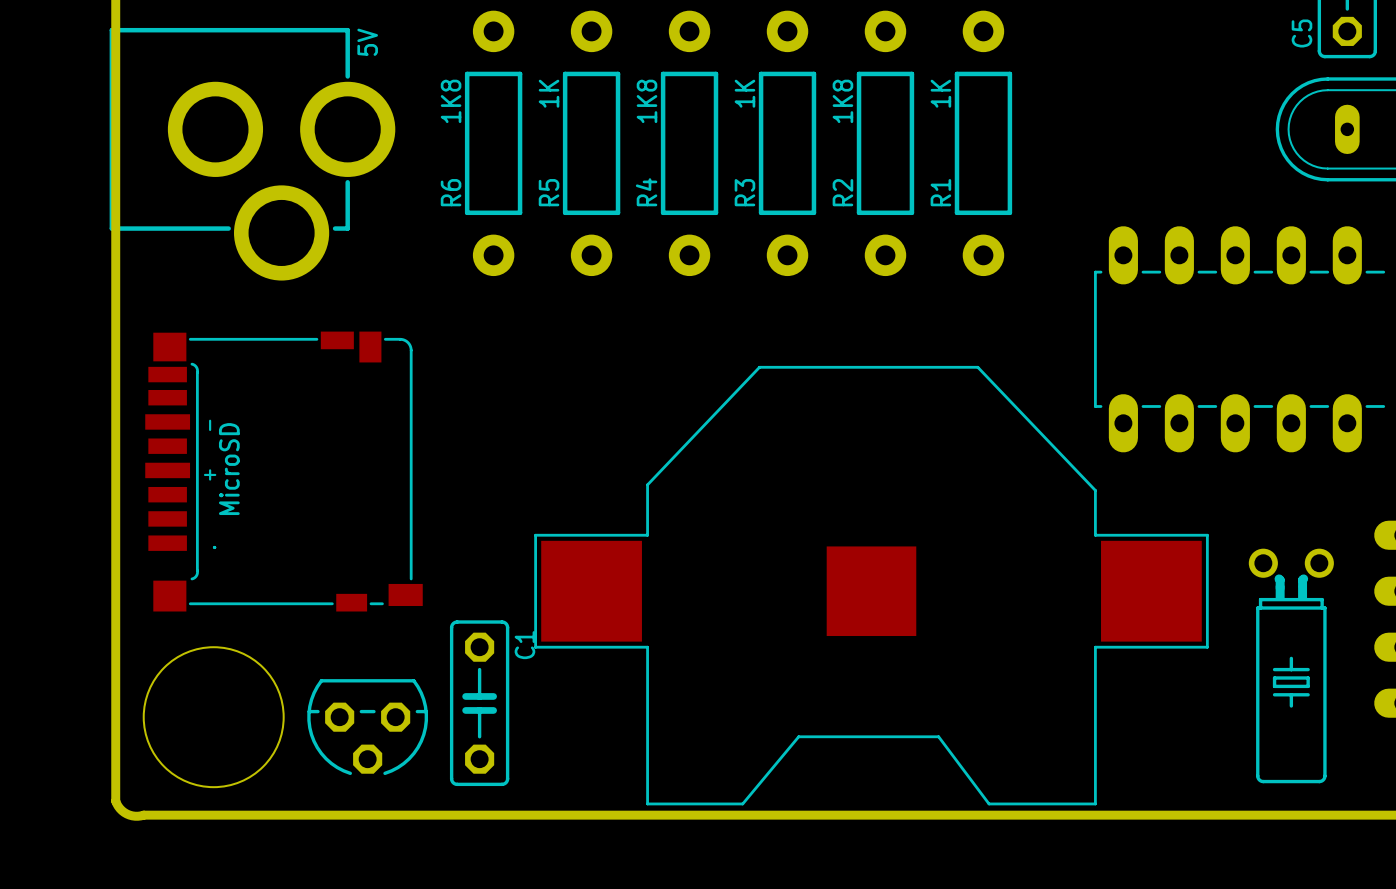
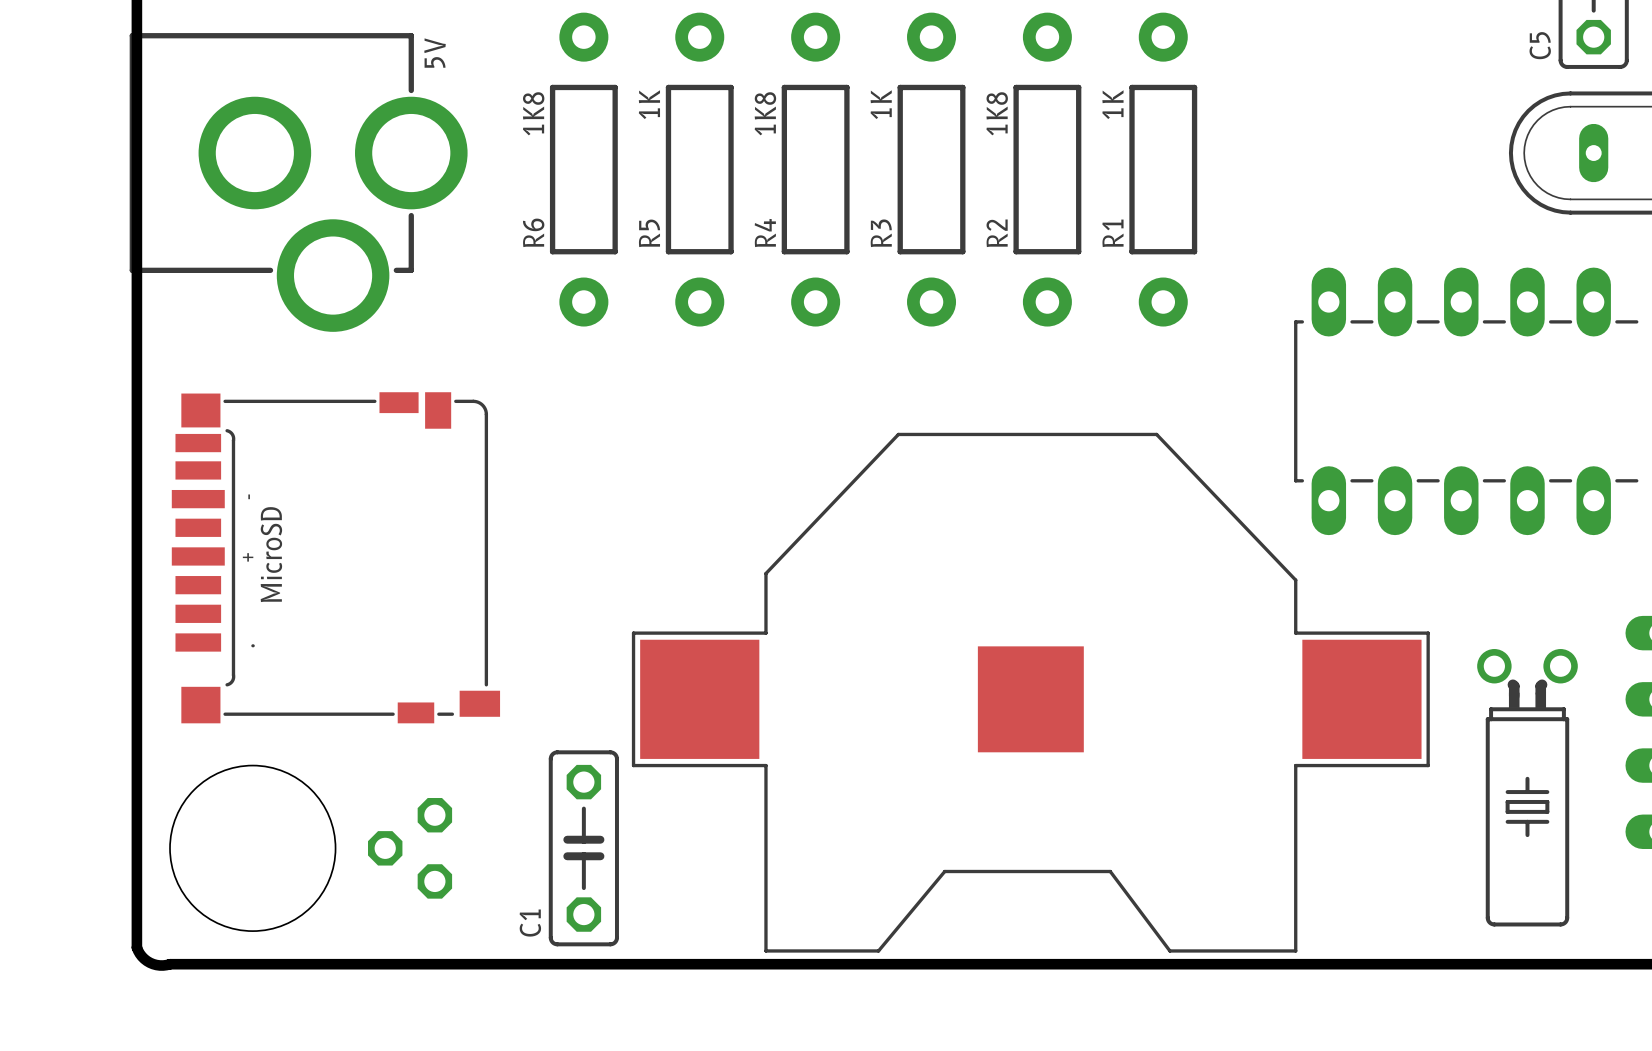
C1 rotation: 0° (479, 703) -> 180° (583, 848)
part side: top (367, 727) -> bottom (410, 848)

